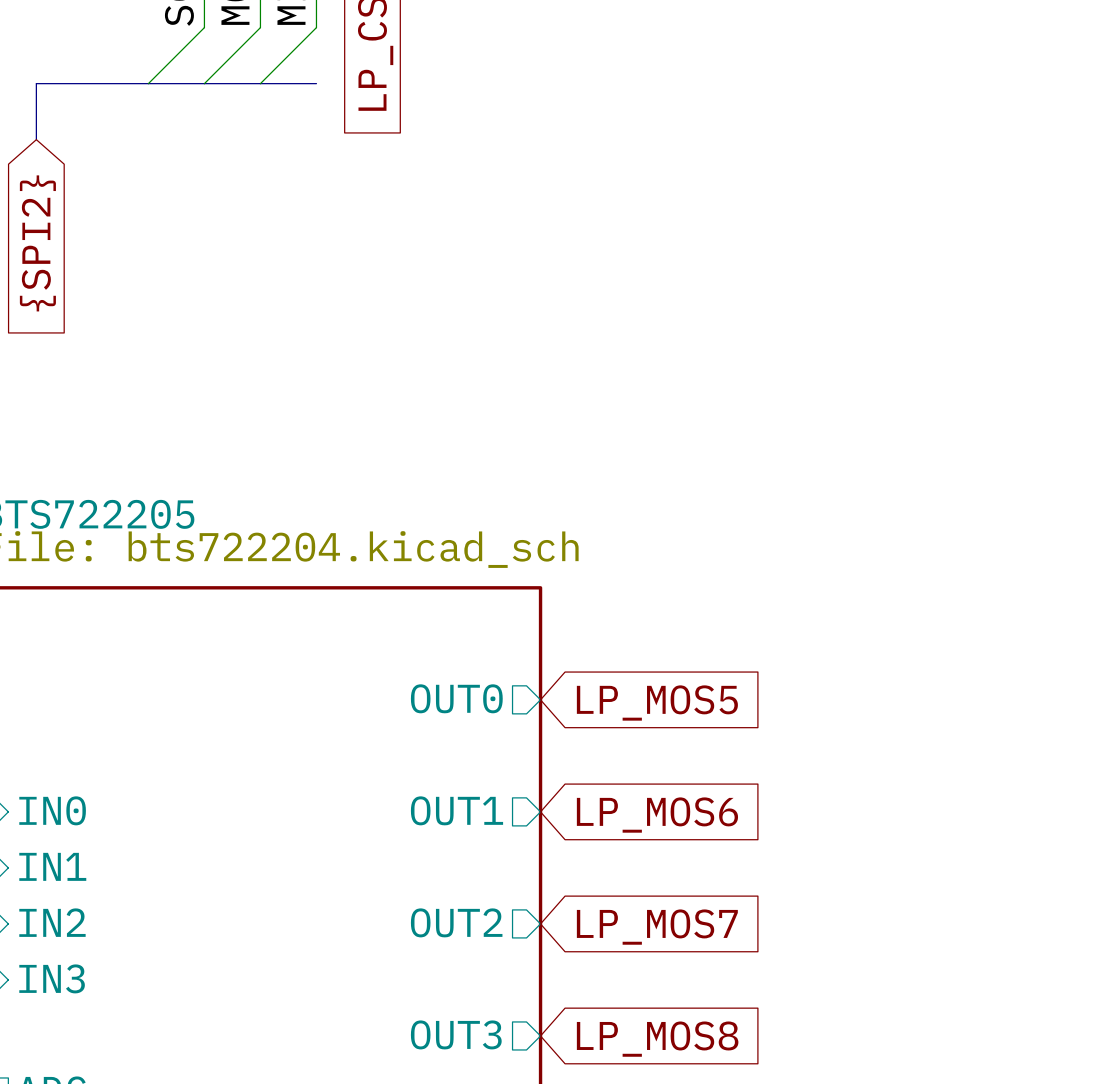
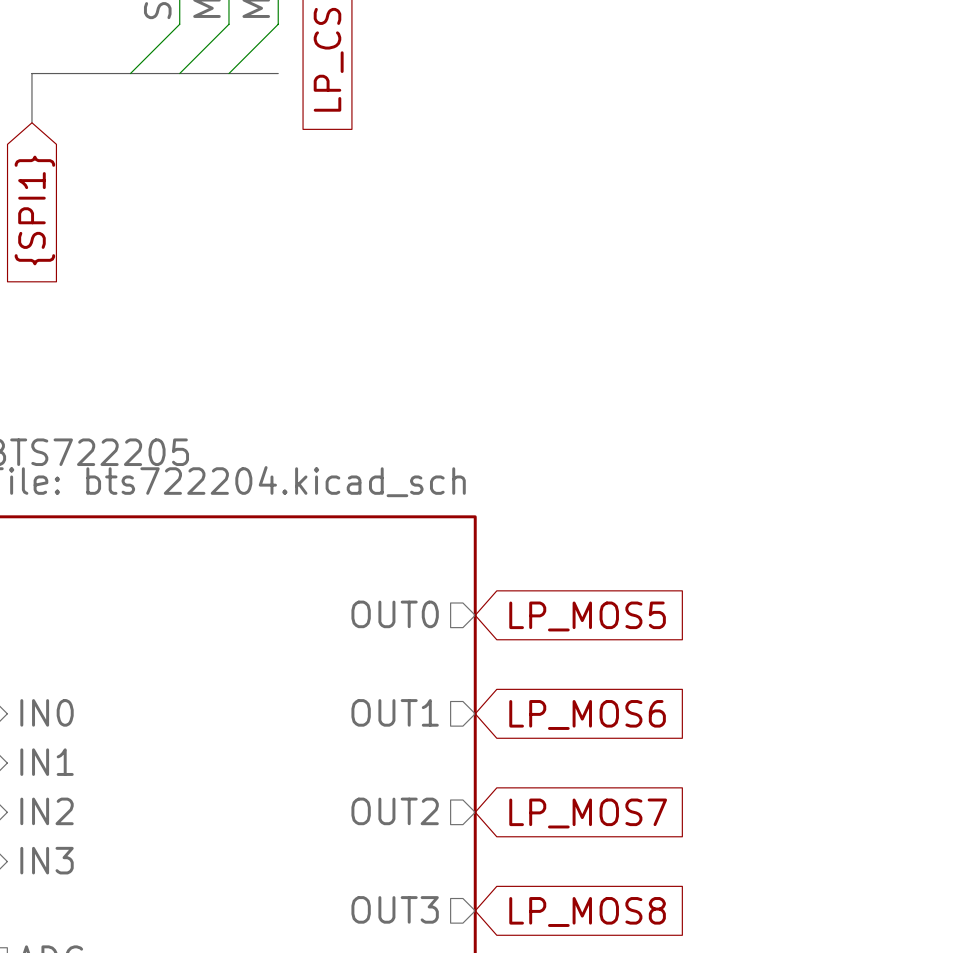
global label: {SPI2} (37, 243) -> {SPI1} (34, 210)

